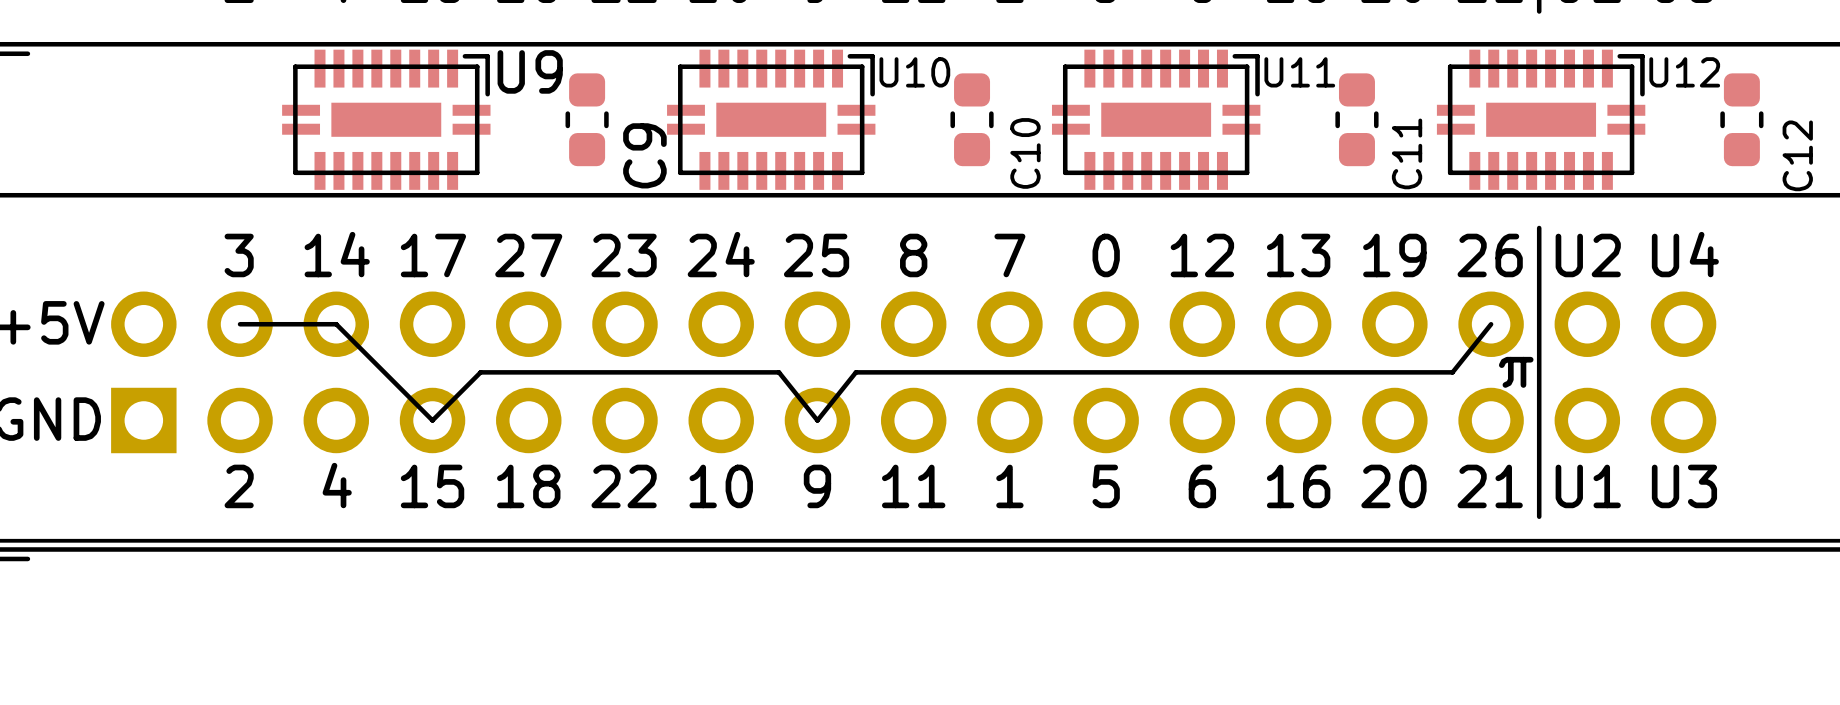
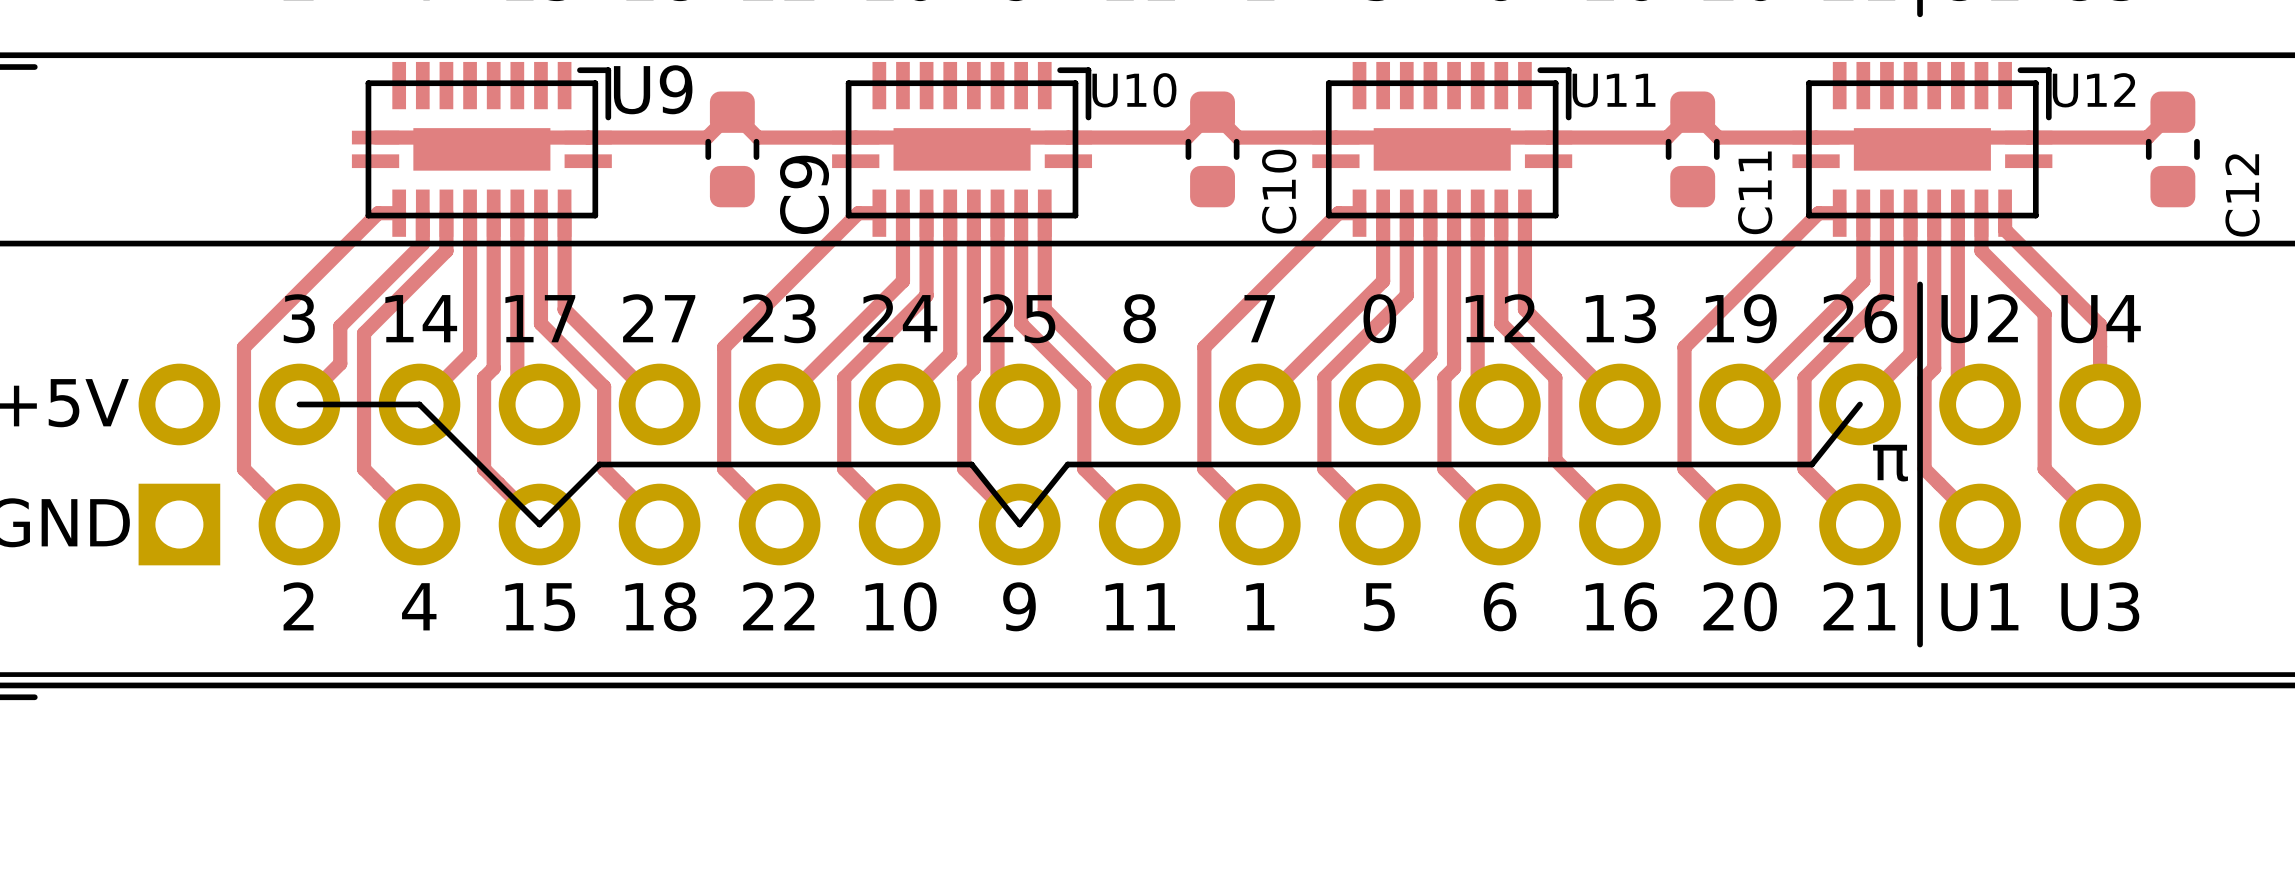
track: none -> (2172, 112) (2147, 137) (1934, 137) (1922, 149) (1910, 137) (1718, 137) (1692, 112) (1667, 137) (1454, 137) (1442, 149) (1430, 137) (1237, 137) (1212, 112) (1187, 137) (973, 137) (962, 149) (950, 137) (757, 137) (732, 112) (706, 137) (493, 137) (481, 149) (470, 137) (375, 137)
track: none -> (399, 213) (378, 213) (243, 347) (243, 469) (299, 524)
track: none -> (422, 213) (422, 243) (340, 326) (340, 363) (299, 404)
track: none -> (446, 213) (446, 251) (364, 333) (364, 469) (419, 524)
track: none -> (470, 213) (470, 353) (419, 404)
track: none -> (493, 213) (493, 368) (484, 377) (484, 469) (539, 524)
track: none -> (517, 213) (517, 382) (539, 404)
track: none -> (540, 213) (540, 323) (604, 386) (604, 469) (659, 524)
track: none -> (564, 213) (564, 309) (659, 404)
track: none -> (879, 213) (858, 213) (724, 347) (724, 469) (779, 524)
track: none -> (902, 213) (902, 281) (779, 404)
track: none -> (926, 213) (926, 295) (844, 377) (844, 469) (899, 524)
track: none -> (950, 213) (950, 353) (899, 404)
track: none -> (973, 213) (973, 368) (964, 377) (964, 469) (1019, 524)
track: none -> (997, 213) (997, 382) (1019, 404)
track: none -> (1021, 213) (1021, 323) (1084, 386) (1084, 469) (1139, 524)
track: none -> (1044, 213) (1044, 309) (1139, 404)
track: none -> (1359, 213) (1338, 213) (1204, 347) (1204, 469) (1259, 524)
track: none -> (1383, 213) (1383, 281) (1259, 404)
track: none -> (1406, 213) (1406, 295) (1324, 377) (1324, 469) (1379, 524)
track: none -> (1430, 213) (1430, 353) (1379, 404)
track: none -> (1454, 213) (1454, 368) (1444, 377) (1444, 469) (1499, 524)
track: none -> (1477, 213) (1477, 382) (1499, 404)
track: none -> (1501, 213) (1501, 323) (1555, 377) (1555, 459) (1619, 524)
track: none -> (1524, 213) (1524, 309) (1619, 404)
track: none -> (1839, 213) (1818, 213) (1684, 347) (1684, 469) (1739, 524)
track: none -> (1863, 213) (1863, 281) (1739, 404)
track: none -> (1886, 213) (1886, 295) (1804, 377) (1804, 469) (1860, 524)
track: none -> (1910, 213) (1910, 353) (1860, 404)
track: none -> (1934, 213) (1934, 368) (1924, 377) (1924, 469) (1980, 524)
track: none -> (1957, 213) (1957, 382) (1980, 404)
track: none -> (1981, 213) (1981, 251) (2044, 314) (2044, 469) (2100, 524)
track: none -> (2005, 213) (2005, 229) (2100, 324) (2100, 404)

